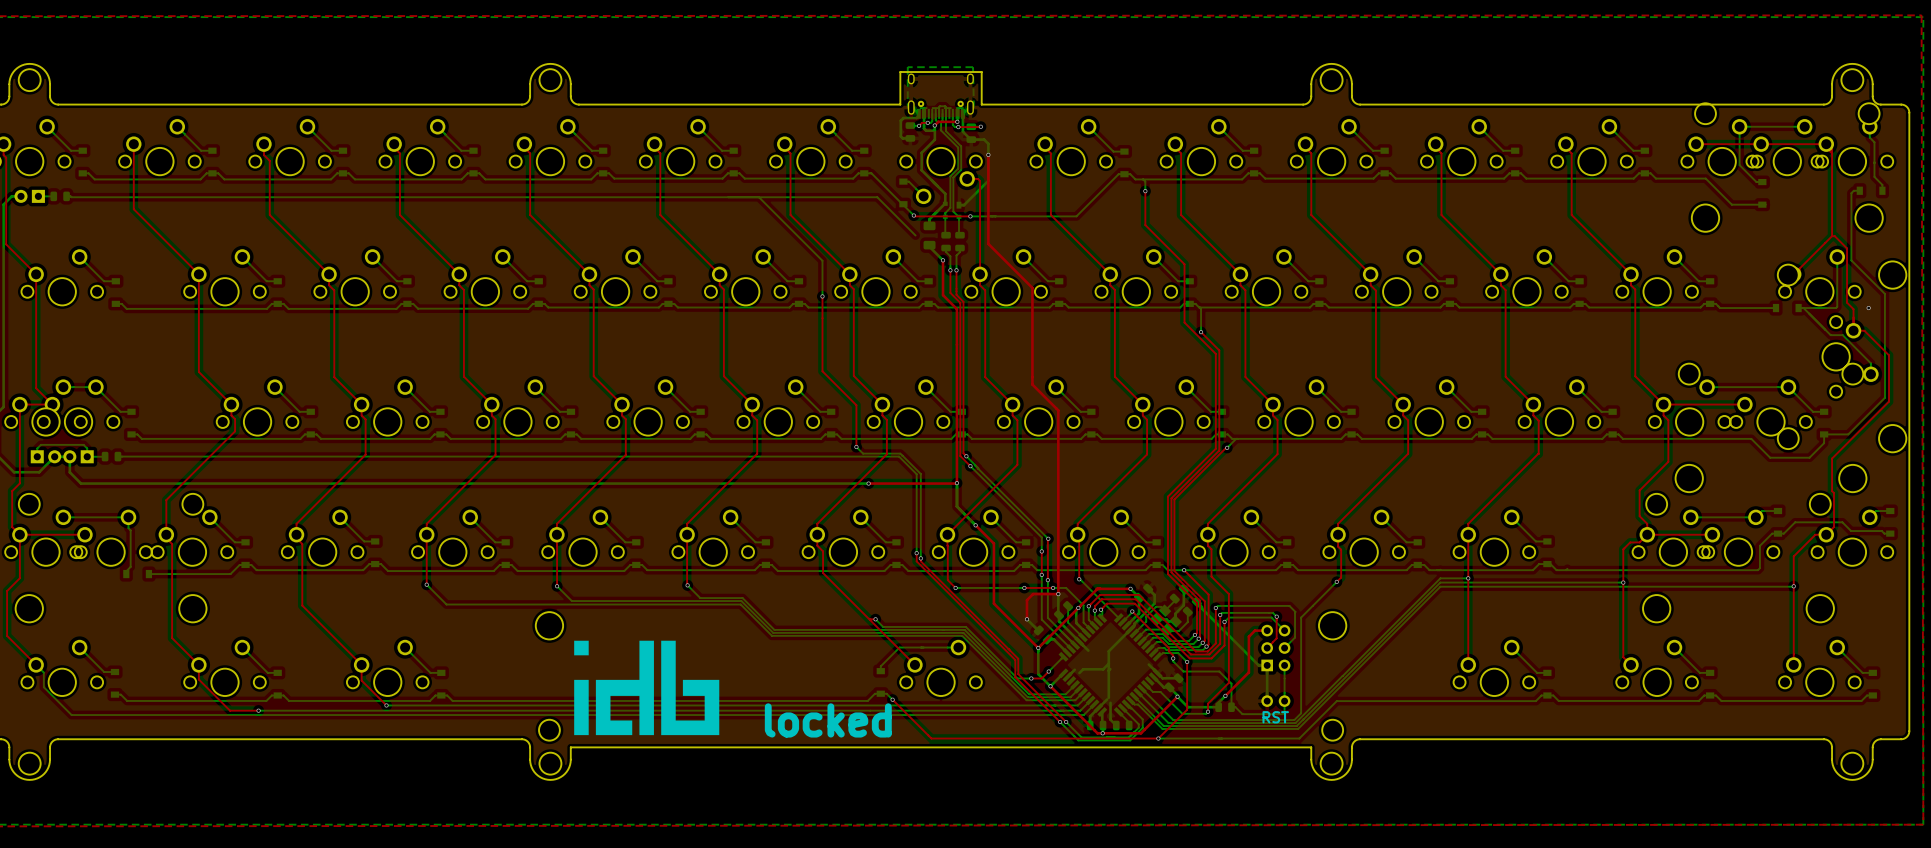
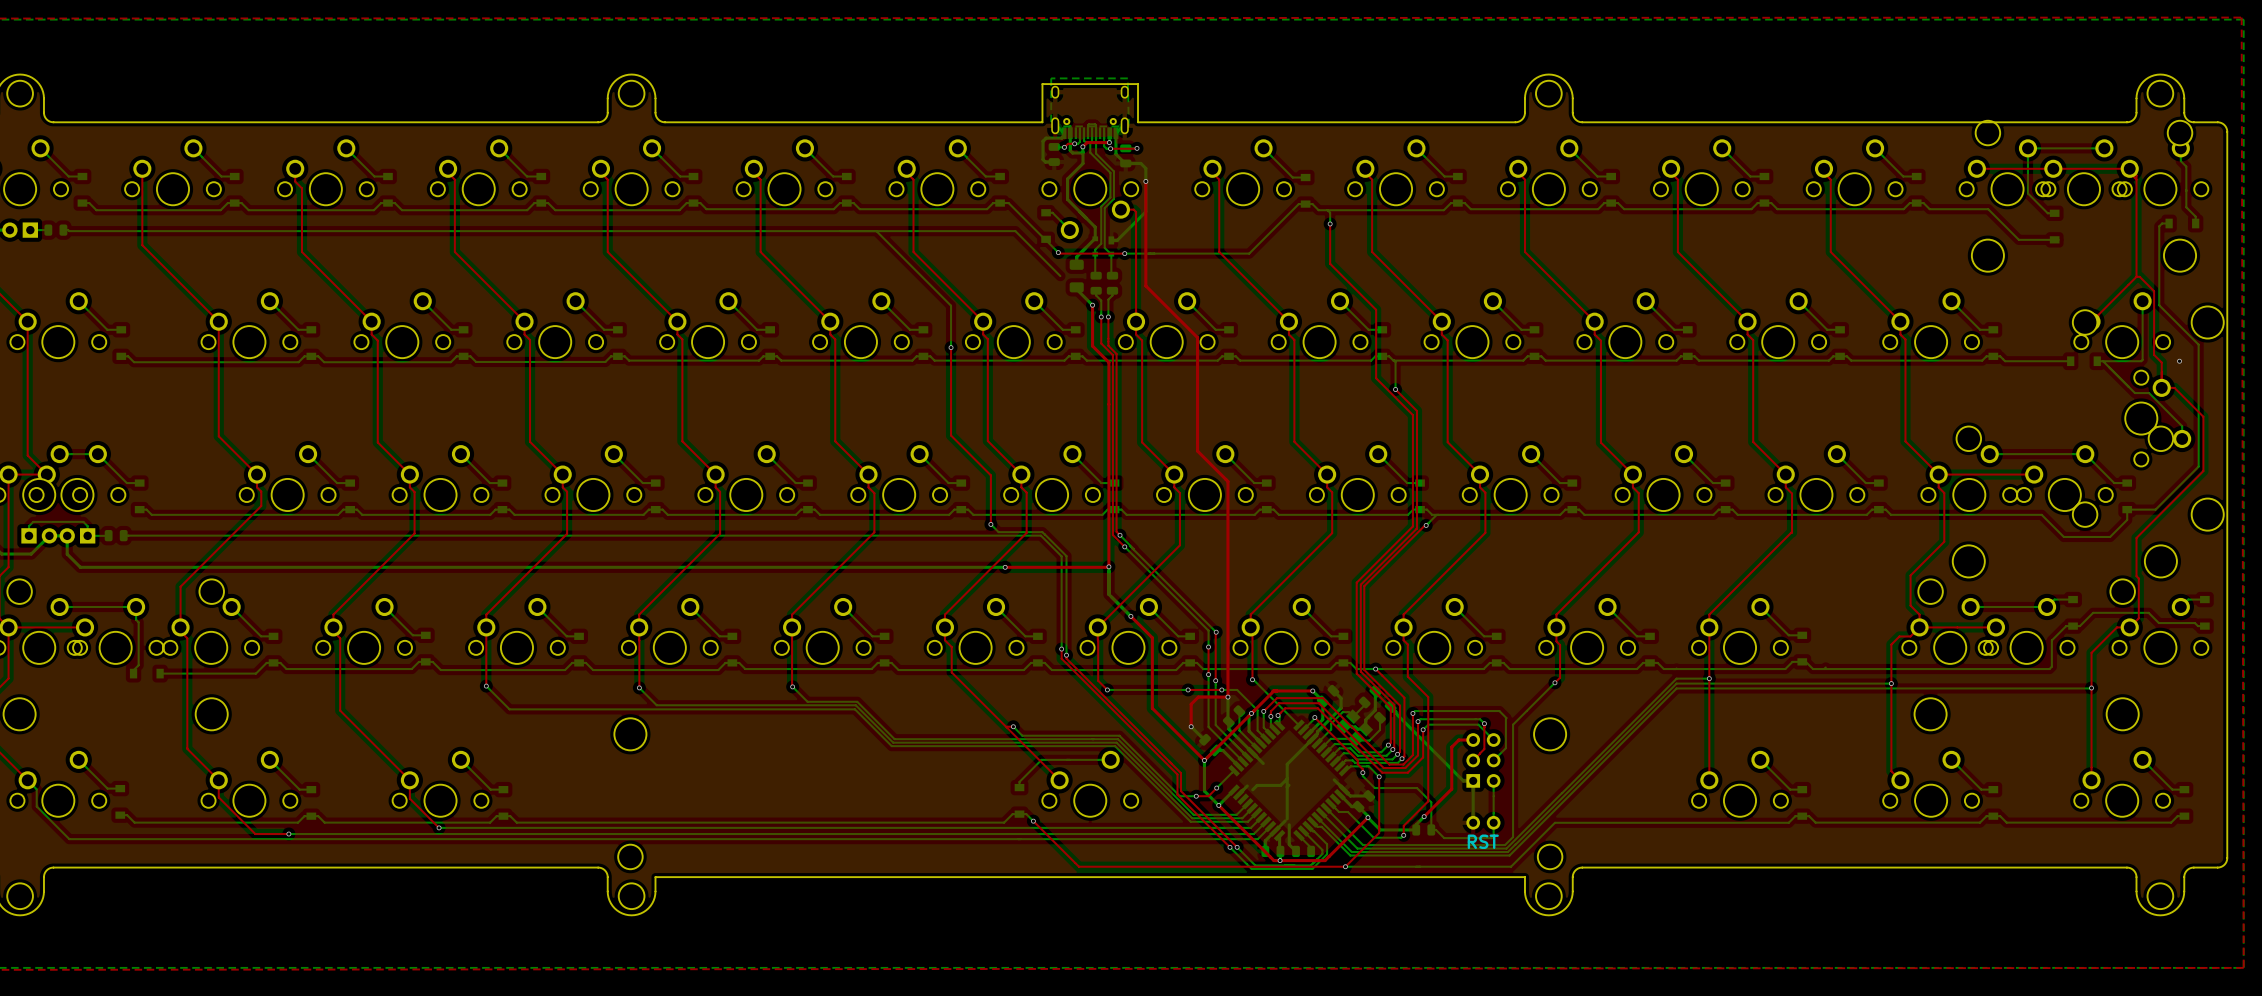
drawing: [574, 640, 720, 736] -> none

